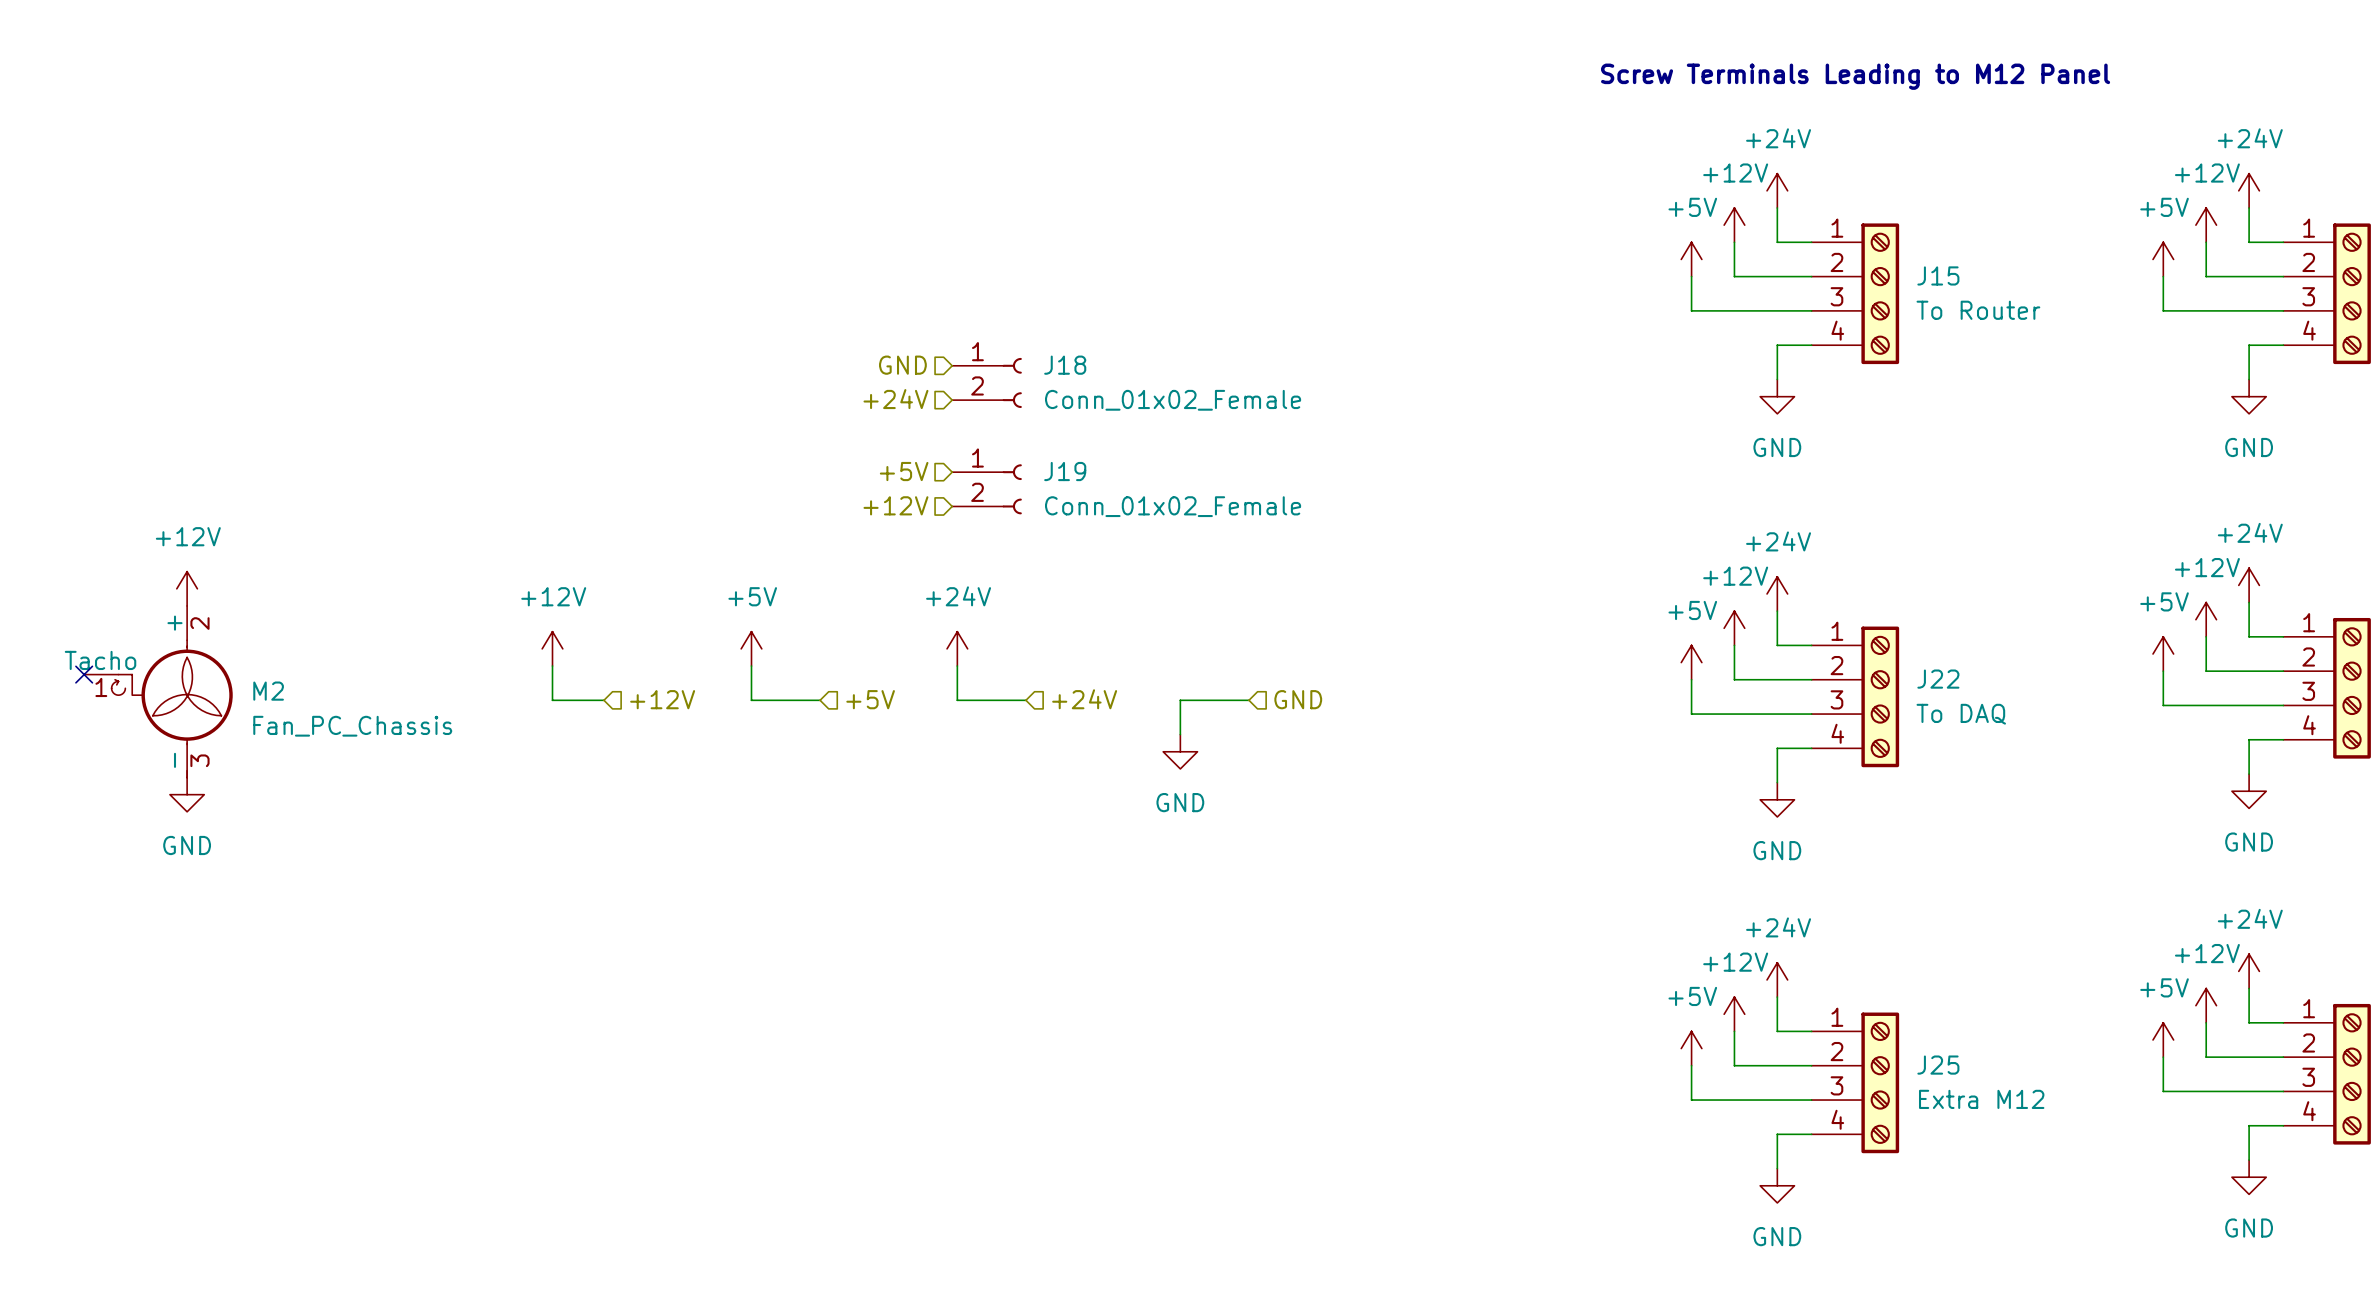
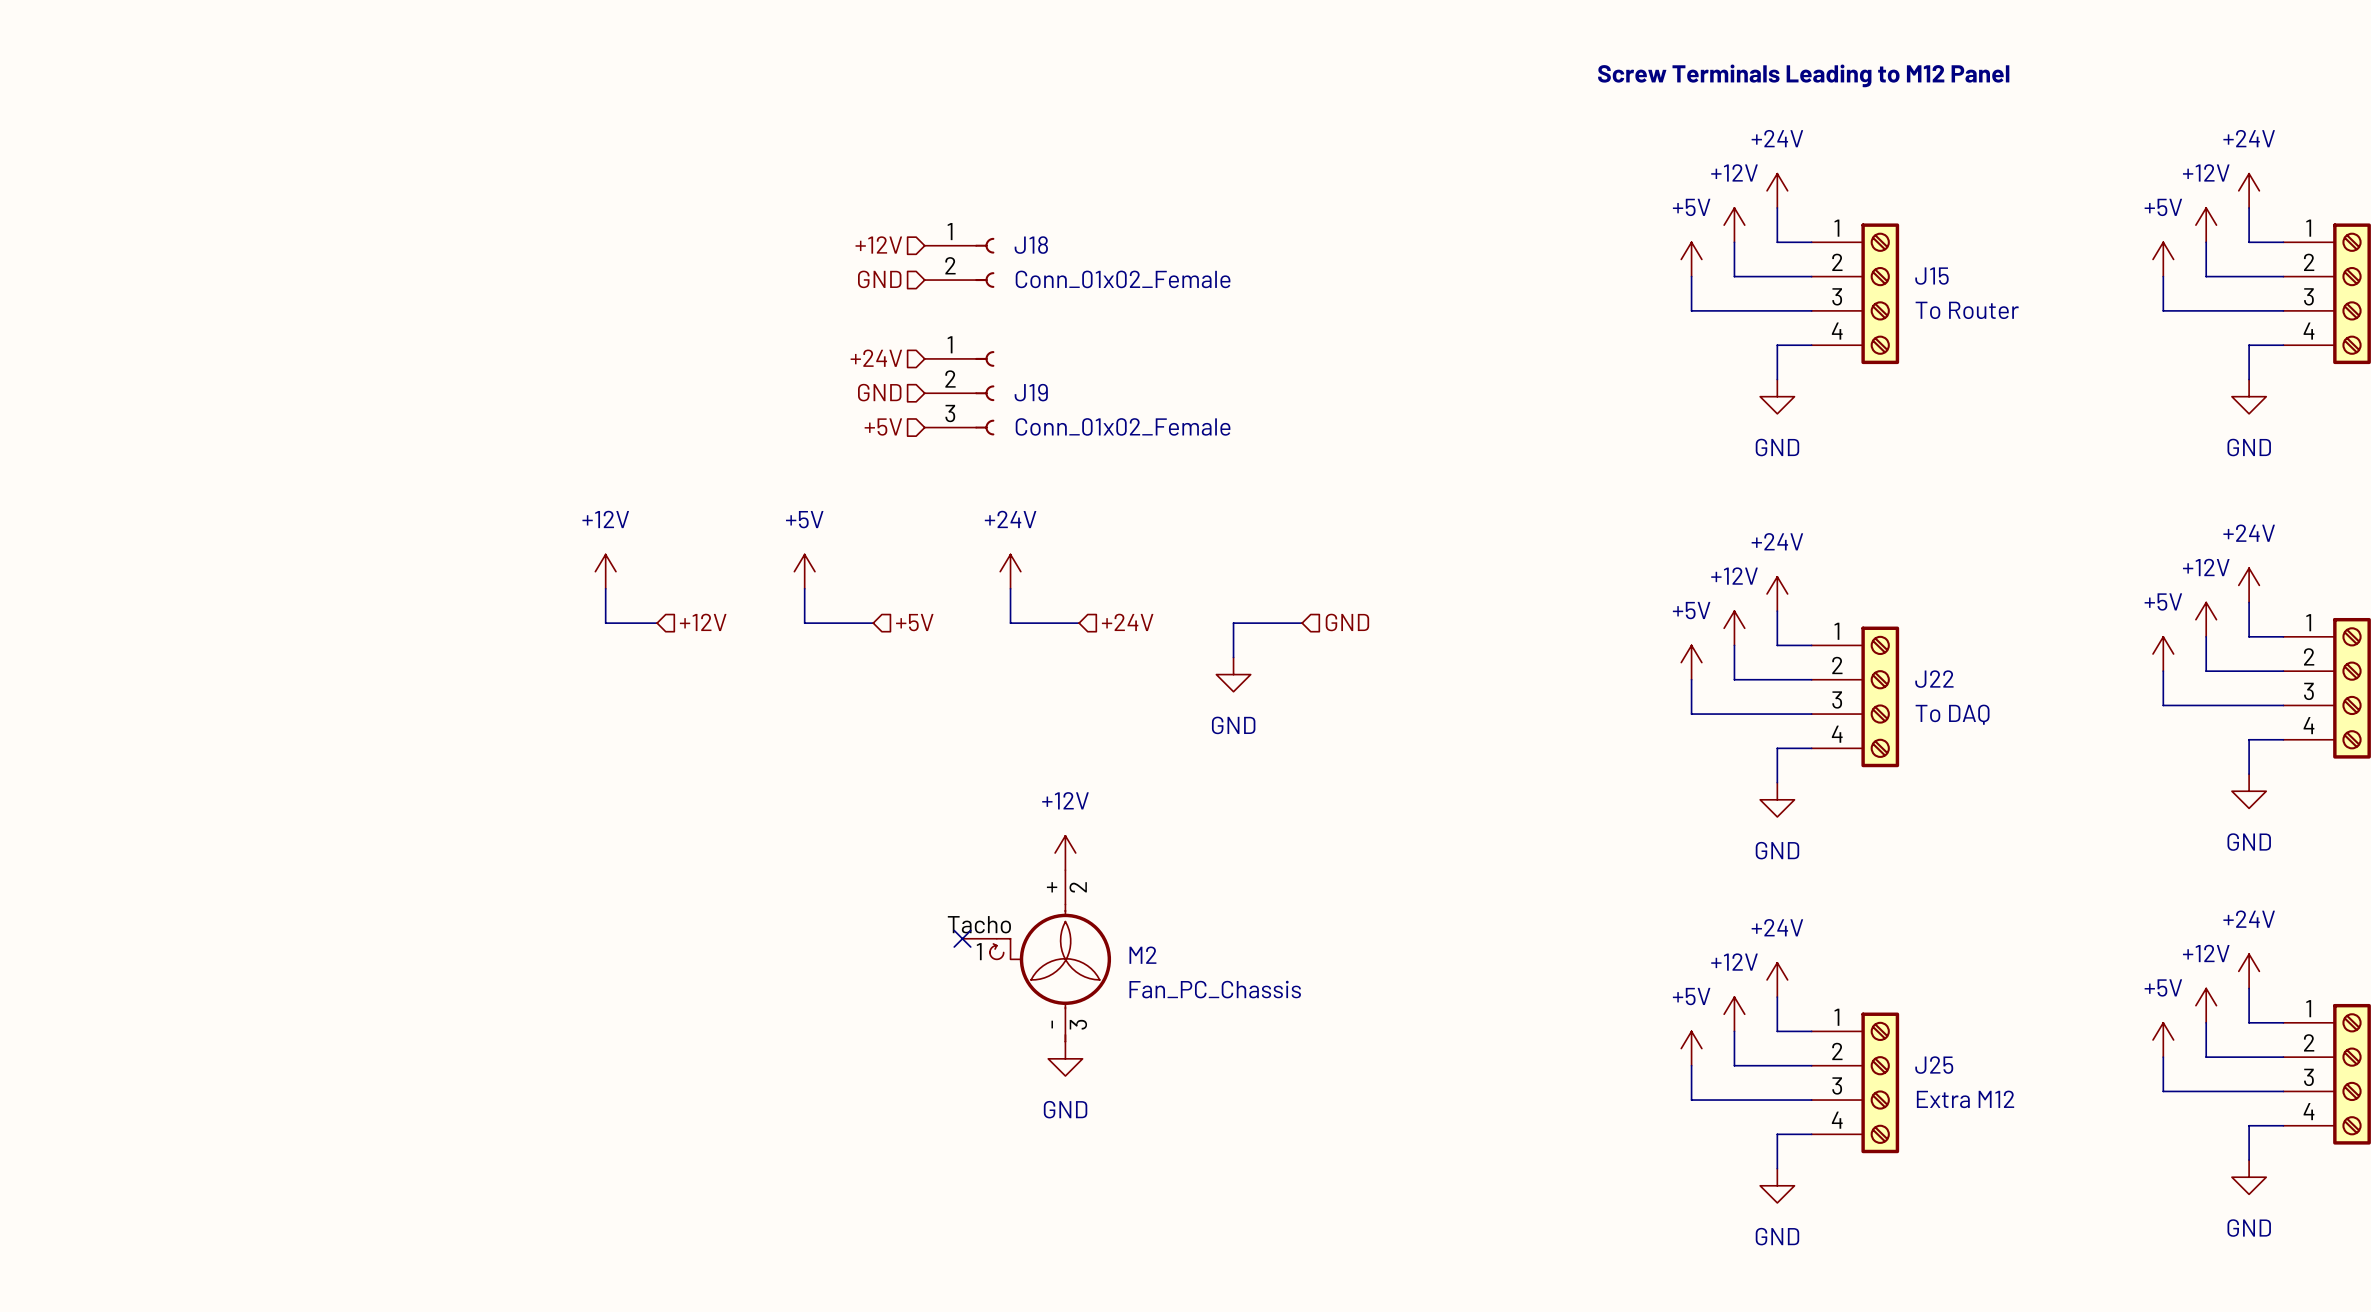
hierarchical label: none -> +12V (878, 244)
hierarchical label: none -> GND (879, 279)
hierarchical label position: GND (902, 365) -> GND (879, 392)
J18 position: (987, 382) -> (959, 262)
hierarchical label position: +24V (895, 399) -> +24V (876, 358)
J19 symbol: [952, 464, 1022, 515] -> [924, 351, 995, 436]
hierarchical label position: +5V (904, 471) -> +5V (883, 427)
hierarchical label: +12V (895, 505) -> none
power symbol: +12V (187, 588) -> none
hierarchical label: none -> +5V (914, 622)
power symbol position: +12V (552, 648) -> +12V (605, 571)
power symbol position: +5V (751, 648) -> +5V (804, 571)
power symbol position: +24V (957, 648) -> +24V (1010, 571)
wire: (552, 666) (552, 700) (603, 700) -> (605, 588) (605, 623) (657, 623)
wire: (751, 666) (751, 700) (820, 700) -> (804, 588) (804, 623) (873, 623)
wire: (957, 666) (957, 700) (1025, 700) -> (1010, 588) (1010, 623) (1079, 623)
no-connect mark: (84, 674) -> none
M2 position: (158, 691) -> (1036, 955)
hierarchical label position: +12V (662, 699) -> +12V (703, 622)
hierarchical label: +5V (870, 699) -> none
hierarchical label position: +24V (1084, 699) -> +24V (1127, 622)
hierarchical label position: GND (1298, 699) -> GND (1347, 622)
wire: (1248, 700) (1180, 700) (1180, 734) -> (1302, 623) (1233, 623) (1233, 657)
power symbol position: GND (1180, 751) -> GND (1233, 674)
power symbol: GND (187, 794) -> none
power symbol: none -> +12V (1065, 852)
no-connect mark: none -> (962, 938)
power symbol: none -> GND (1065, 1058)

